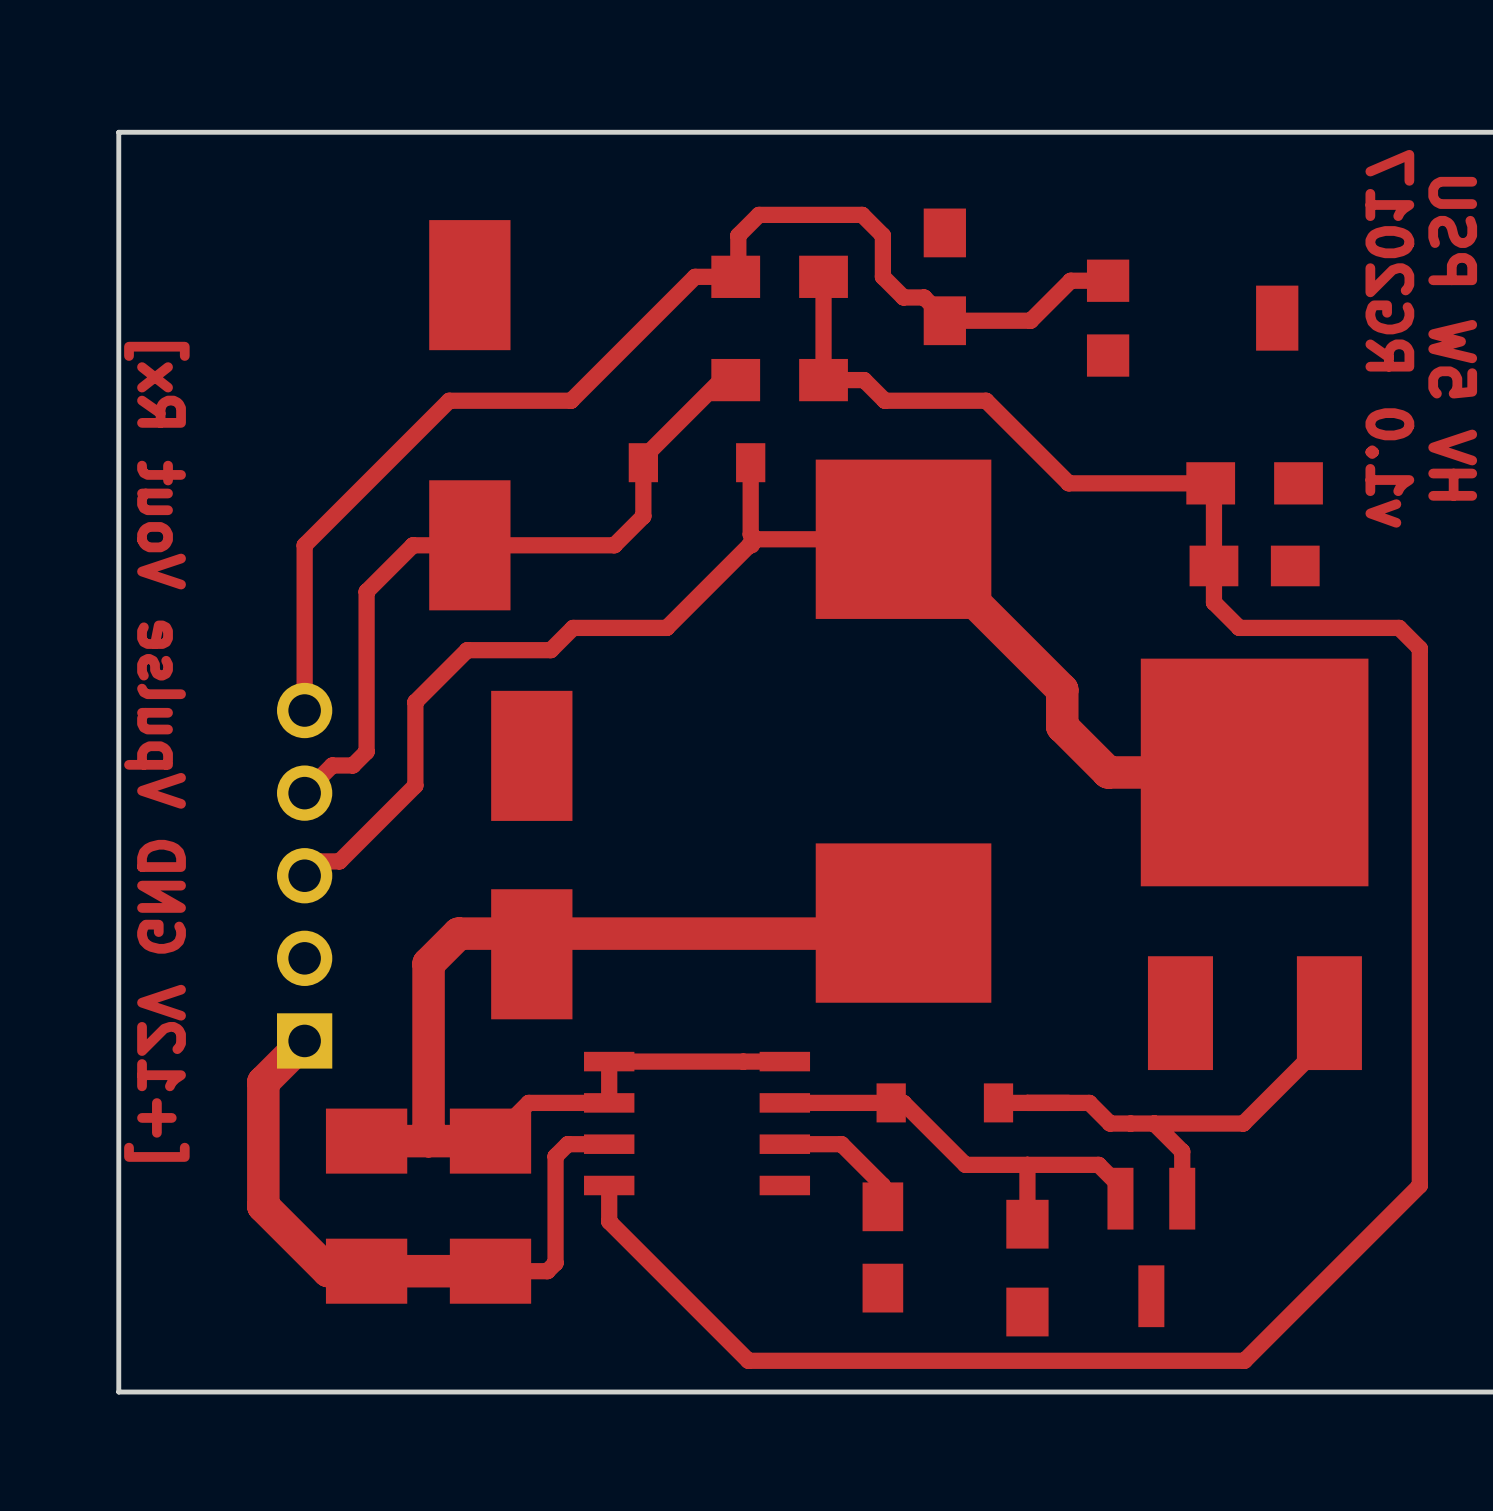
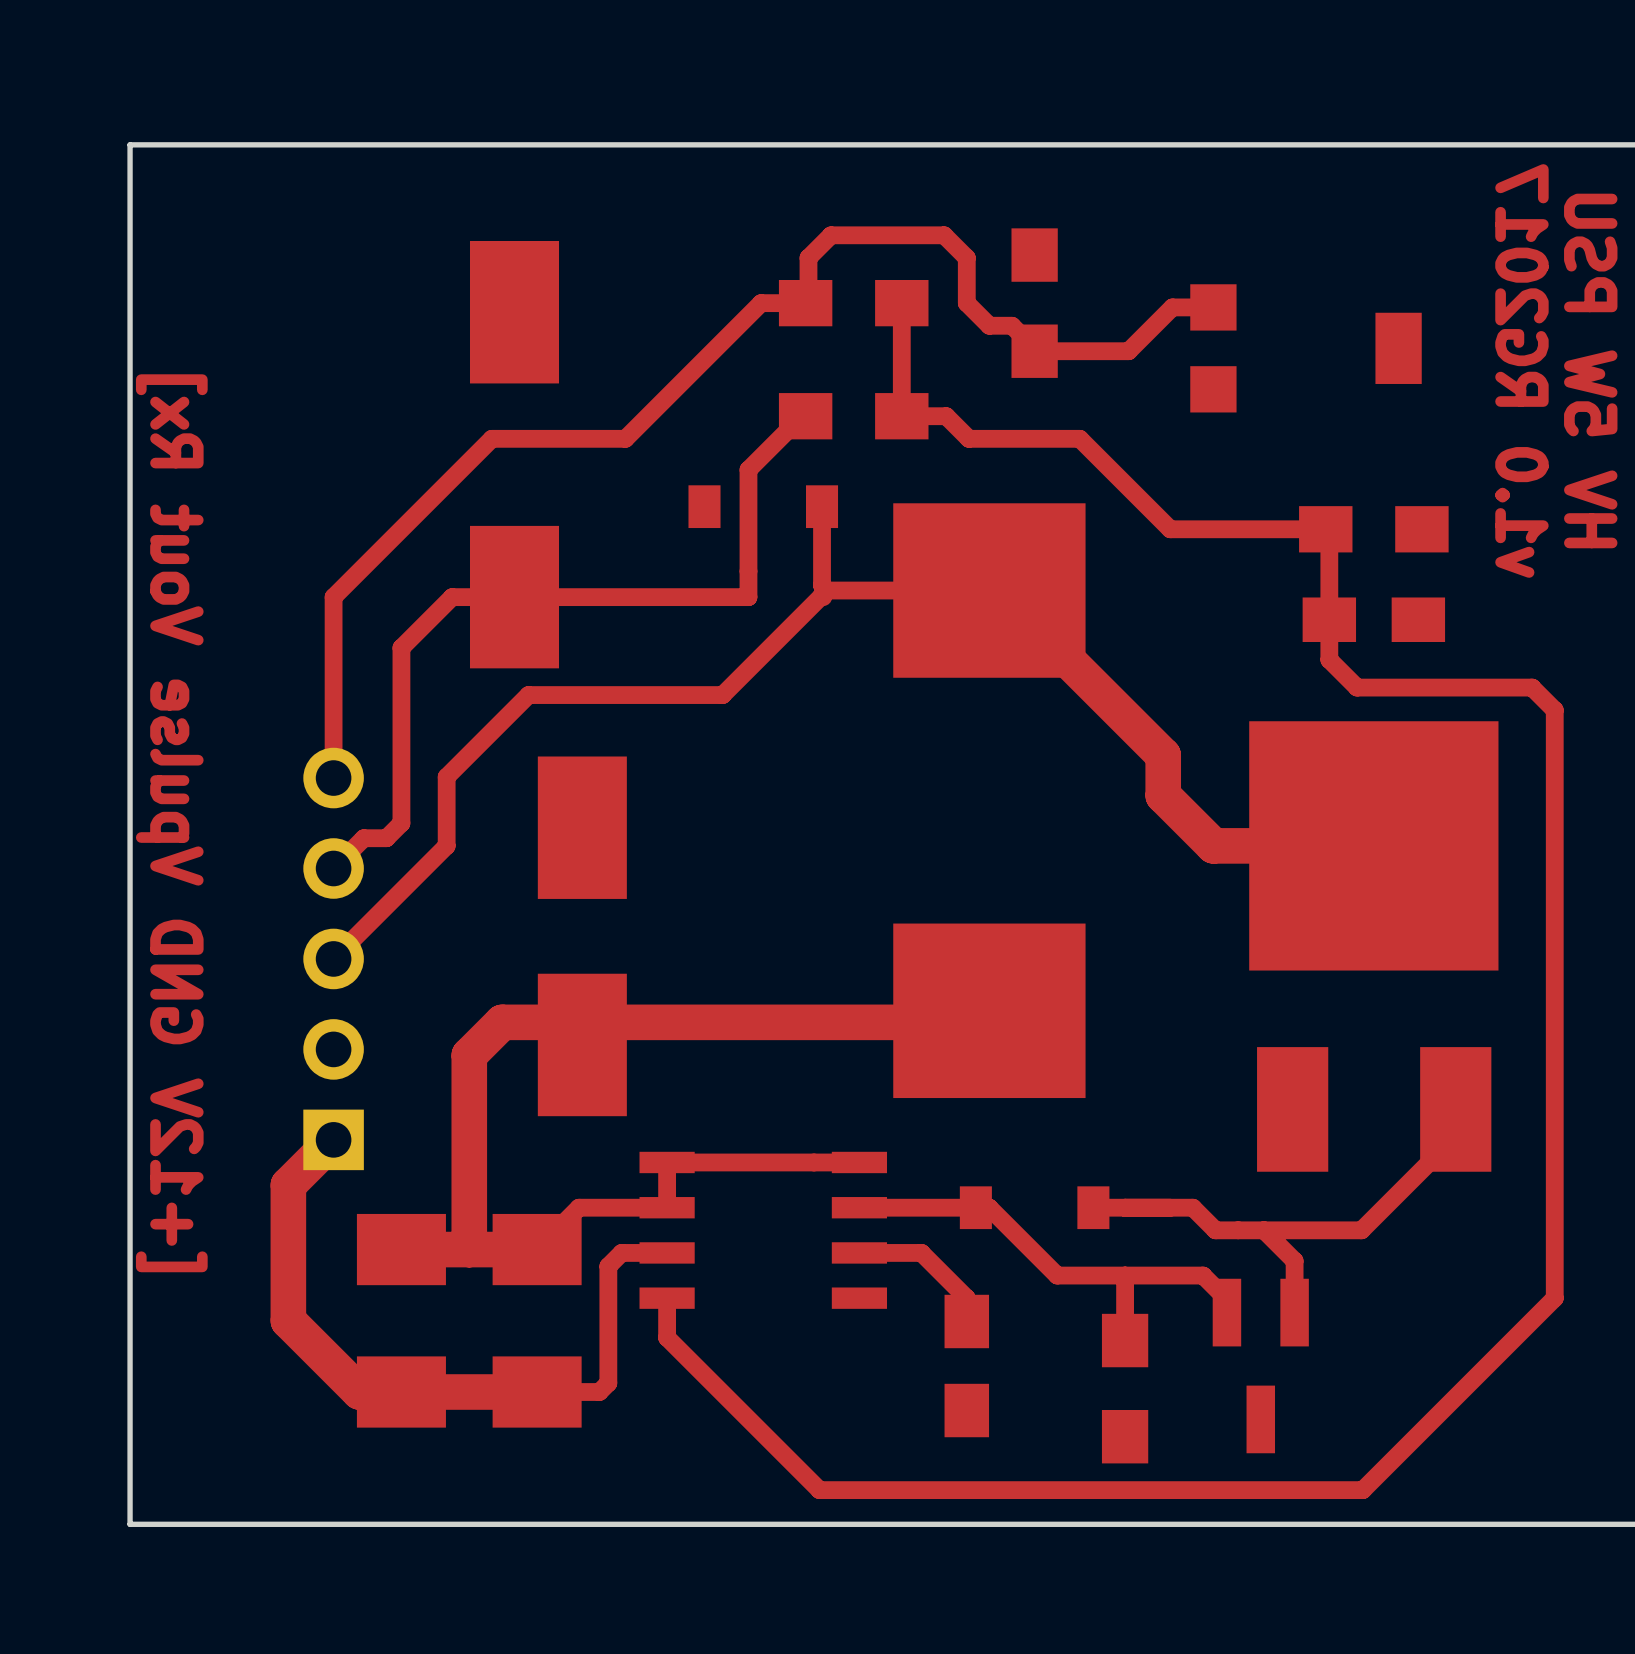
top track: (732, 380) (721, 380) (643, 457) (643, 516) (614, 545) -> (802, 416) (748, 469) (748, 597) (672, 597)
top track: (666, 627) (573, 627) (550, 650) (467, 650) -> (730, 687) (722, 695) (528, 695) (511, 711)
top track: (415, 702) (415, 785) (339, 861) (318, 861) -> (454, 768) (446, 776) (446, 845) (349, 943)

